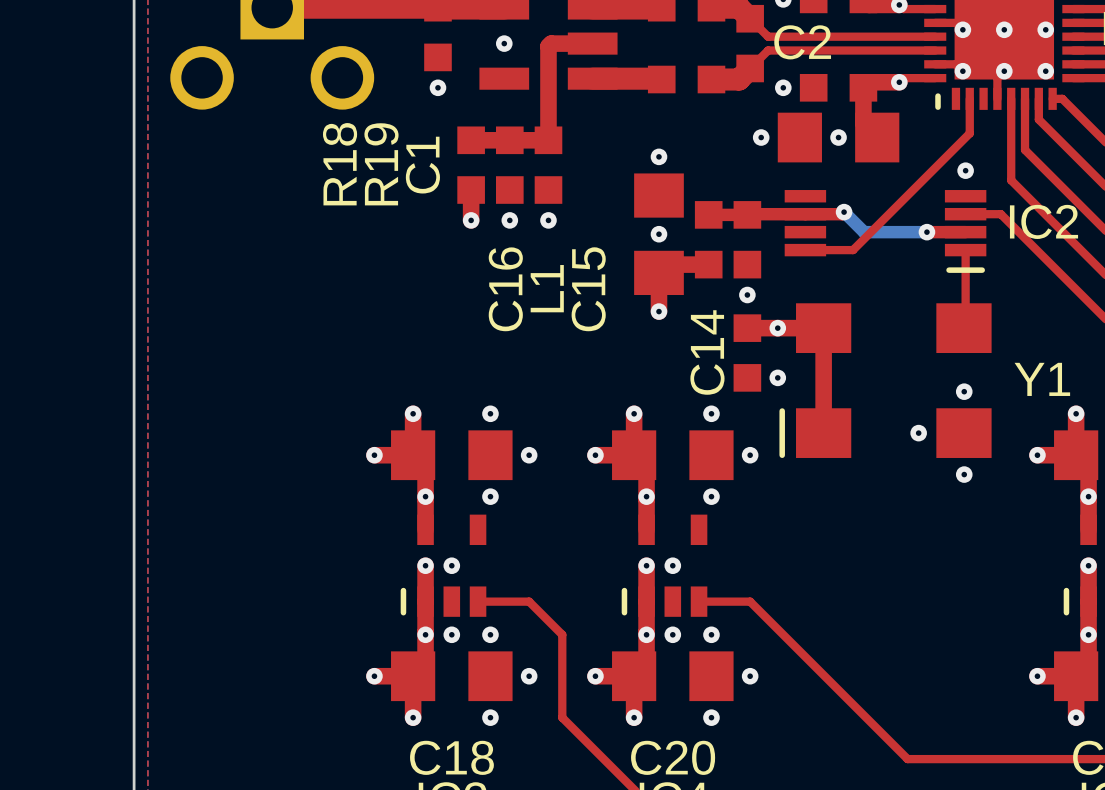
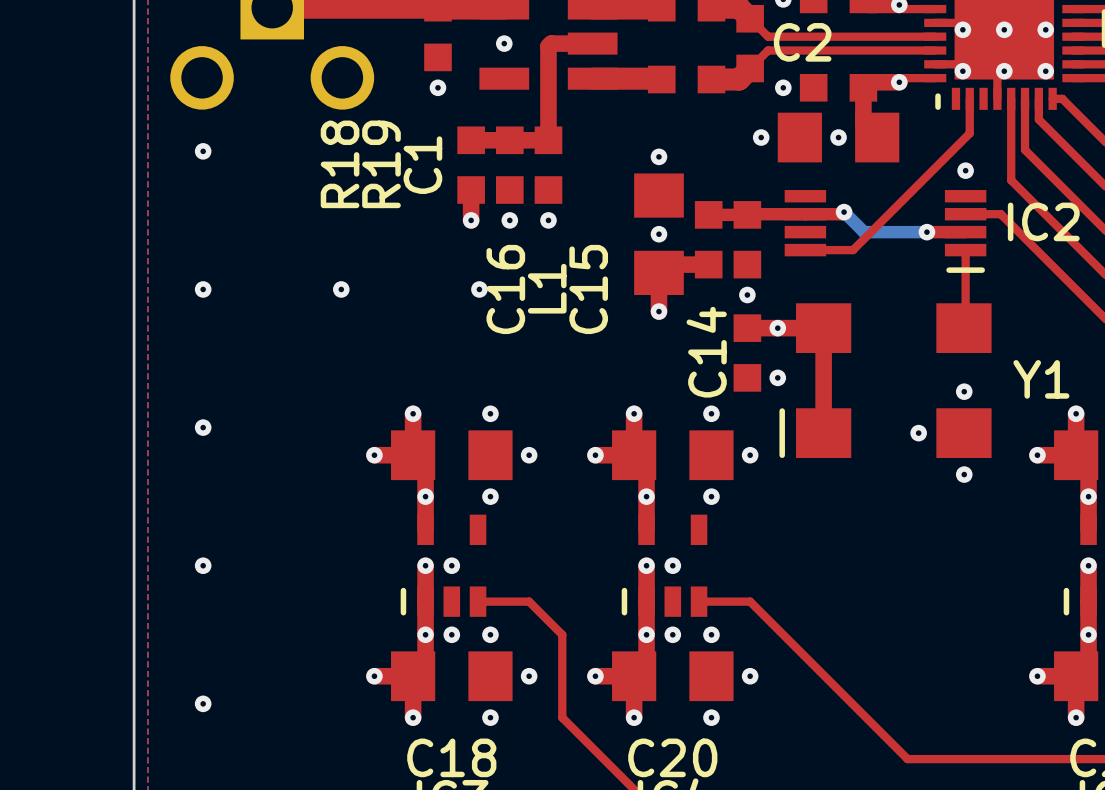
via: none -> (203, 151)
via: none -> (203, 289)
via: none -> (341, 289)
via: none -> (479, 289)
via: none -> (203, 427)
via: none -> (203, 565)
via: none -> (203, 703)

